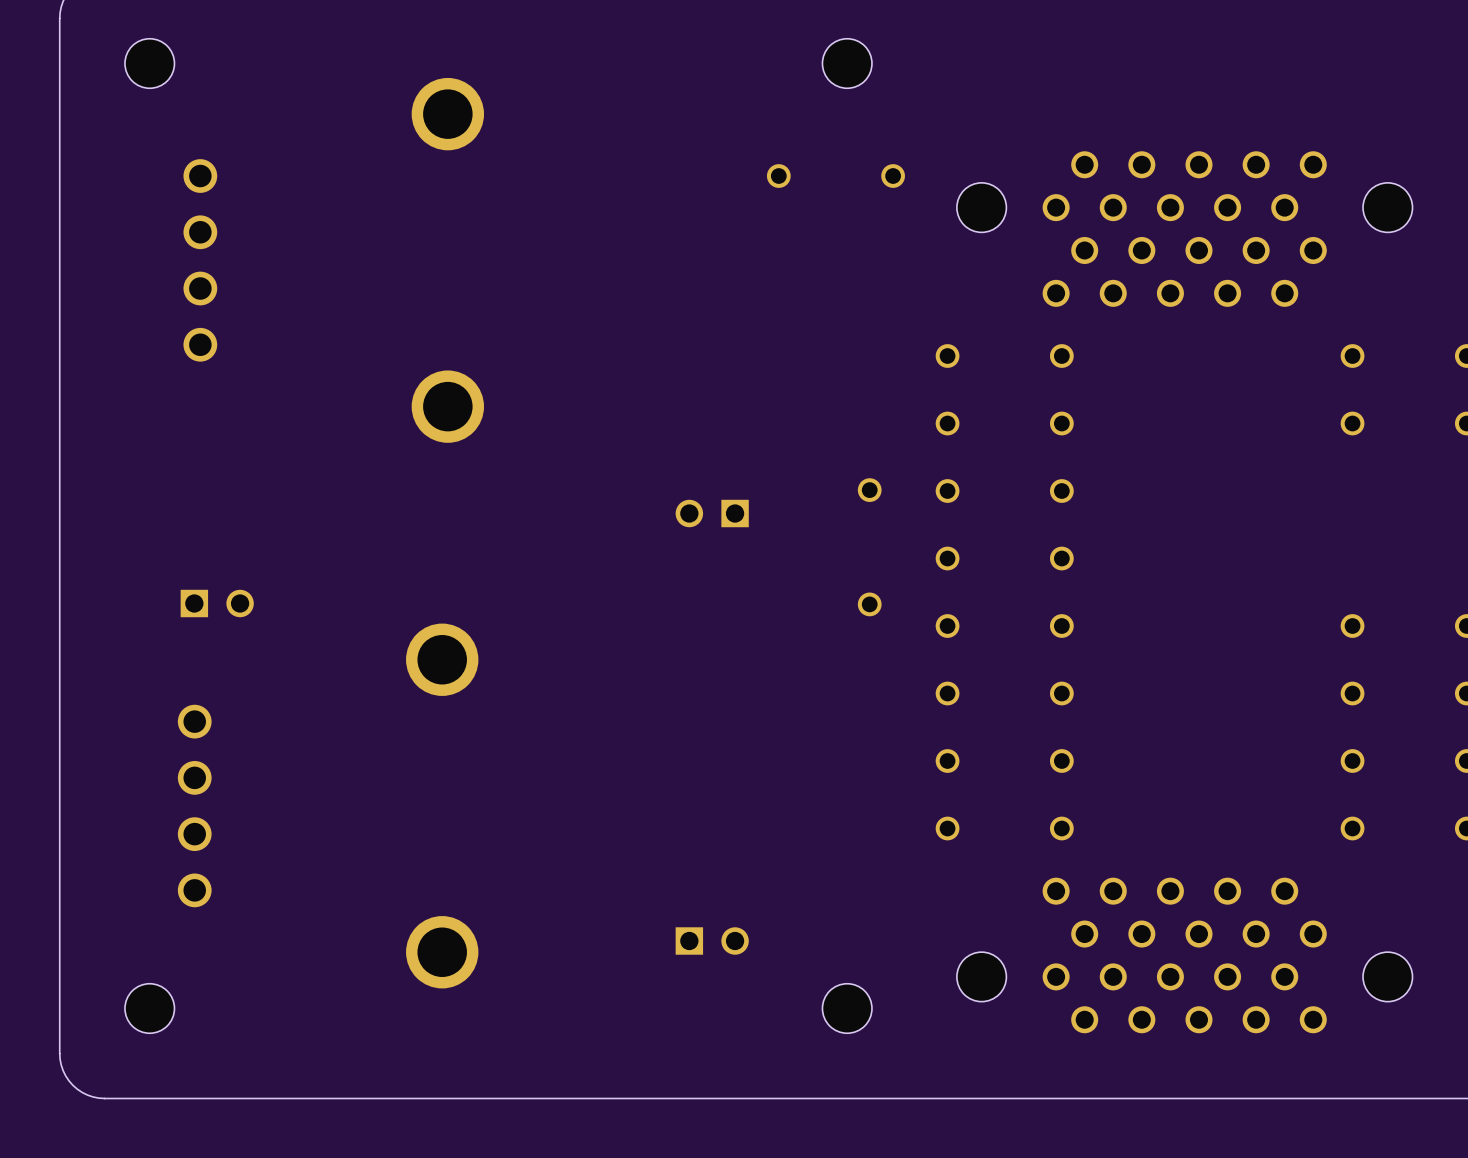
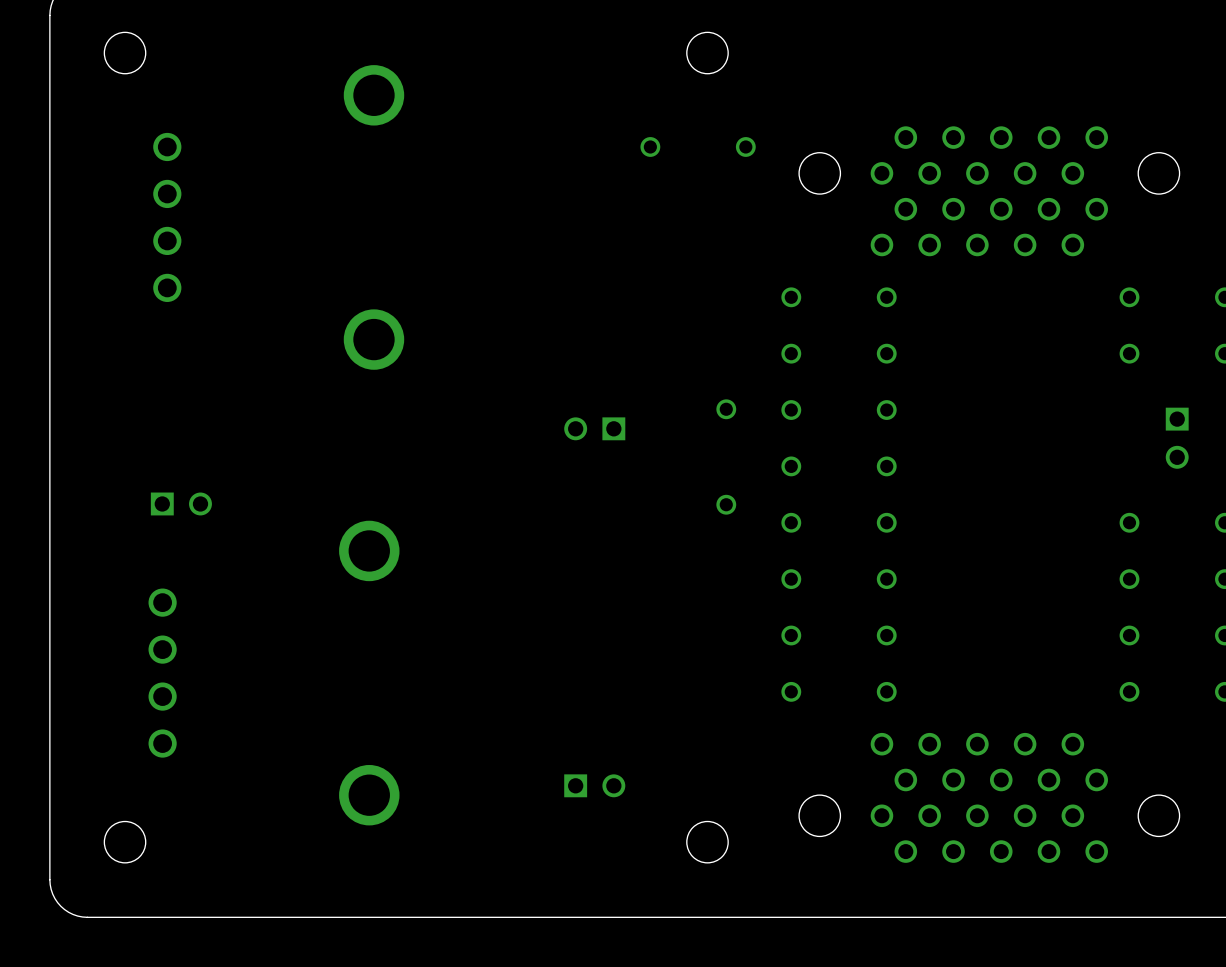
part: none -> (1177, 438)

